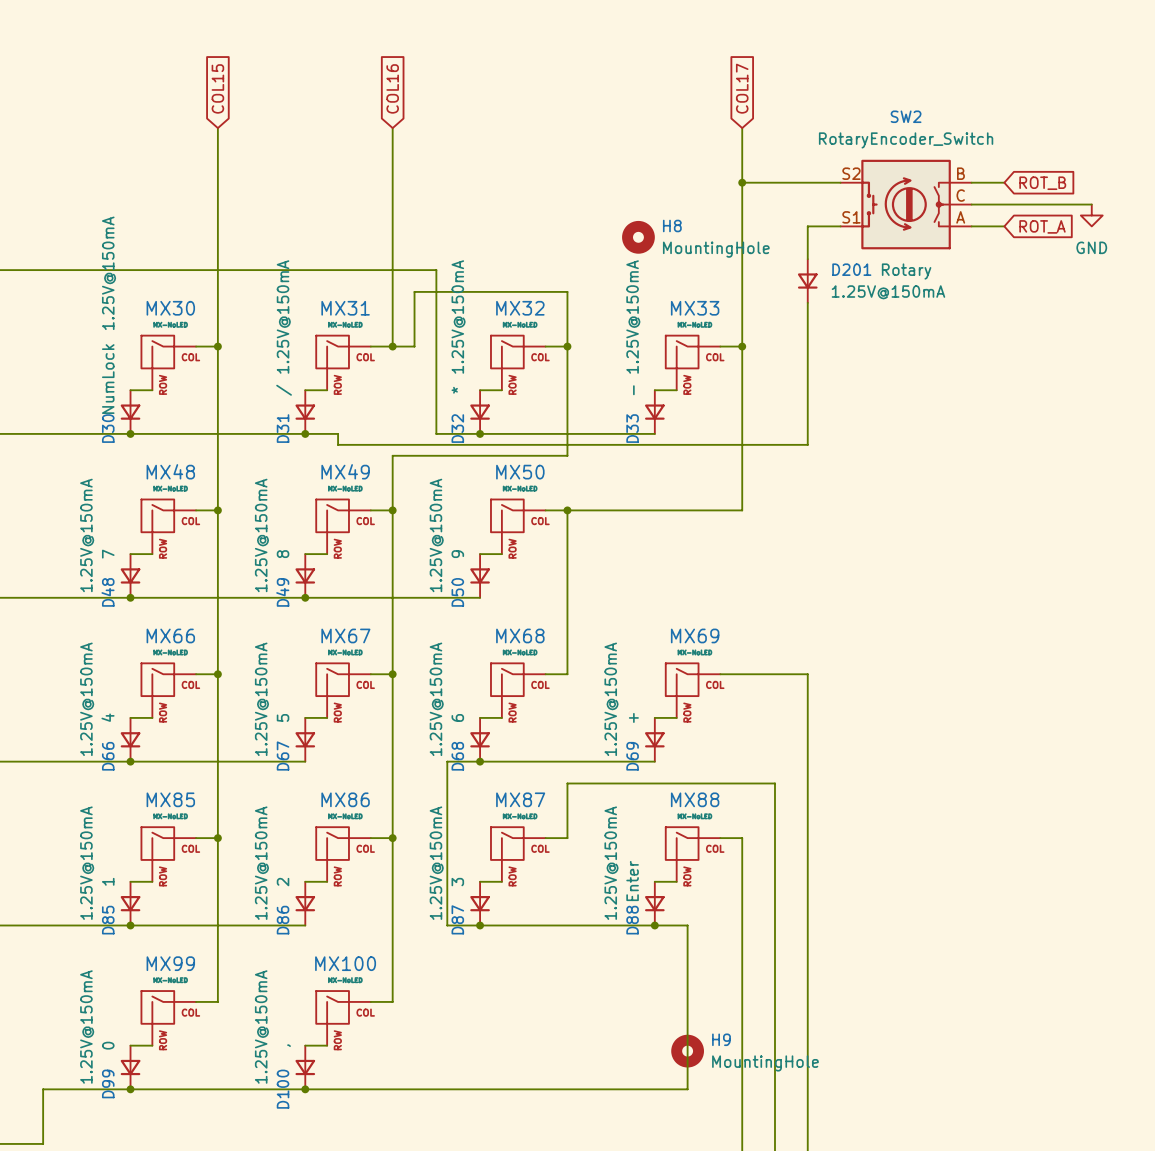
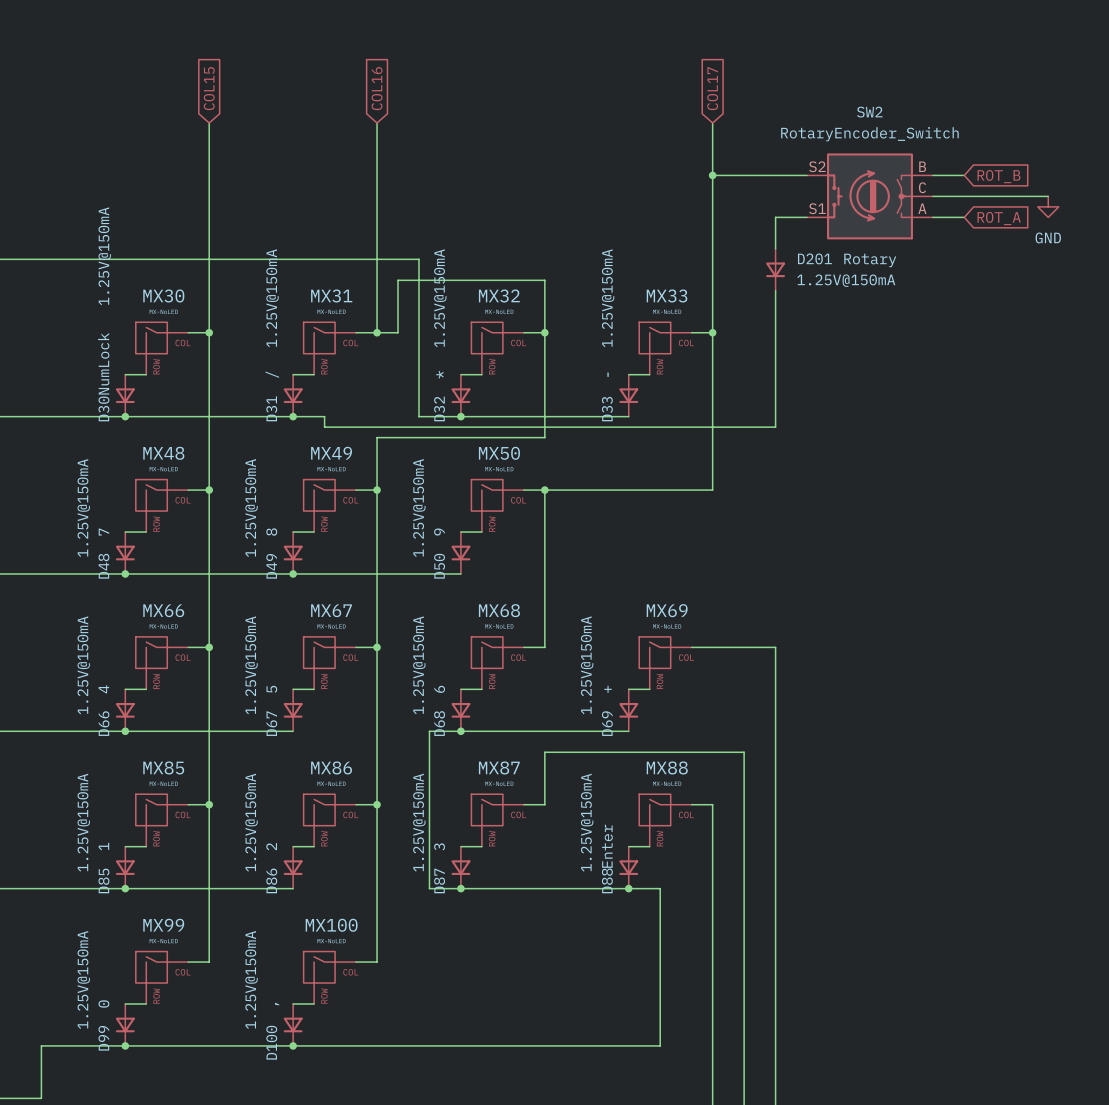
H8: MountingHole (638, 237) -> none
H9: MountingHole (687, 1051) -> none

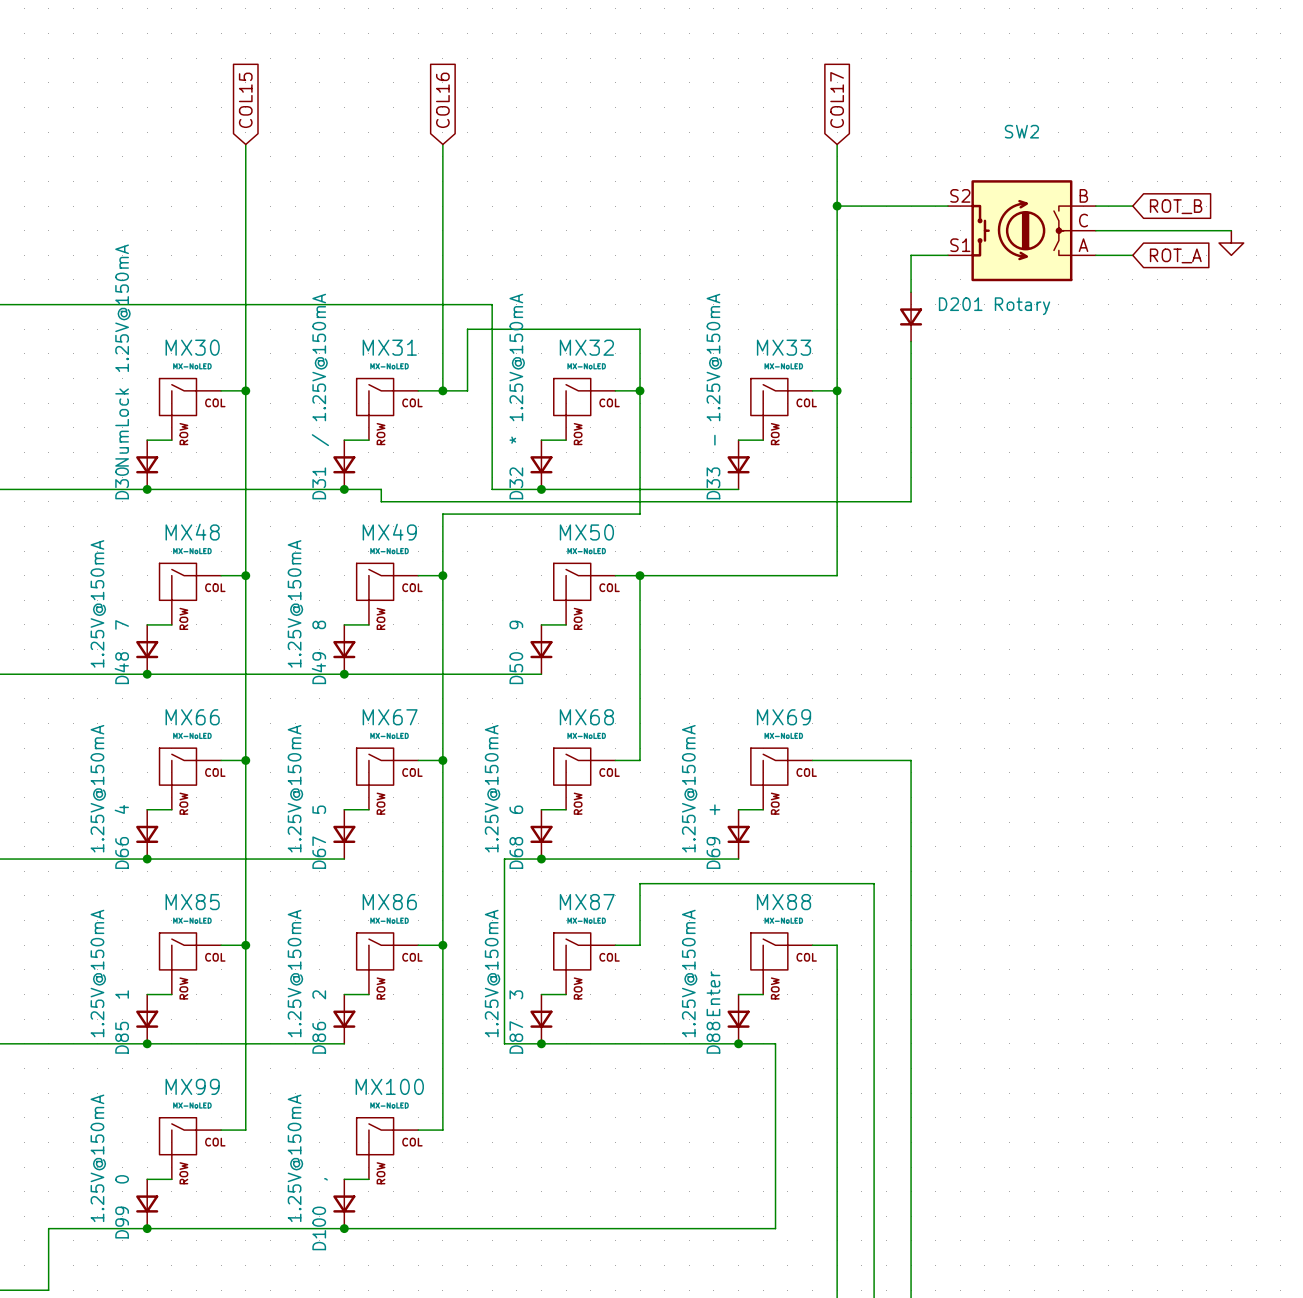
SW2 value: RotaryEncoder_Switch (869, 134) -> none
power symbol text: GND (1048, 237) -> none
D201 value: 1.25V@150mA (846, 280) -> none
D50 value: 1.25V@150mA (419, 508) -> none

